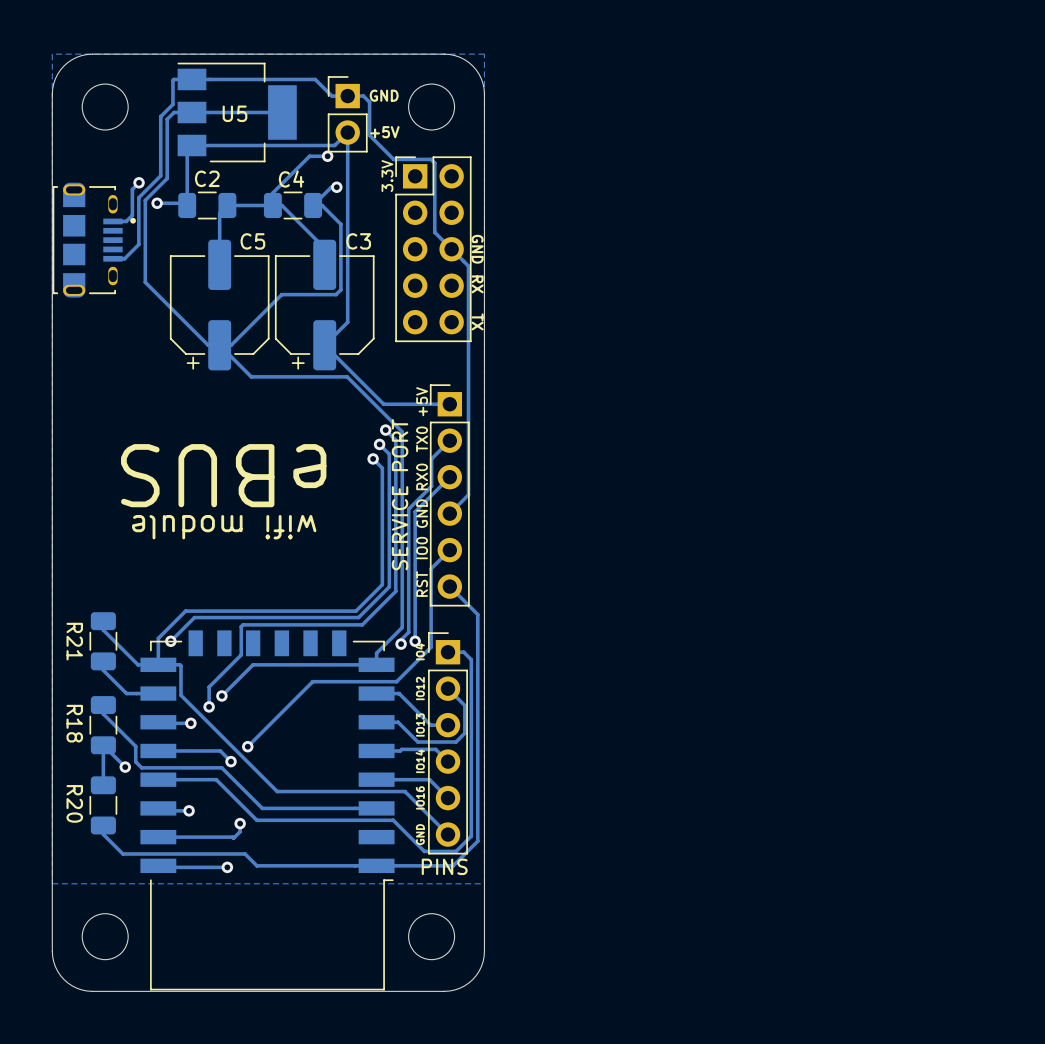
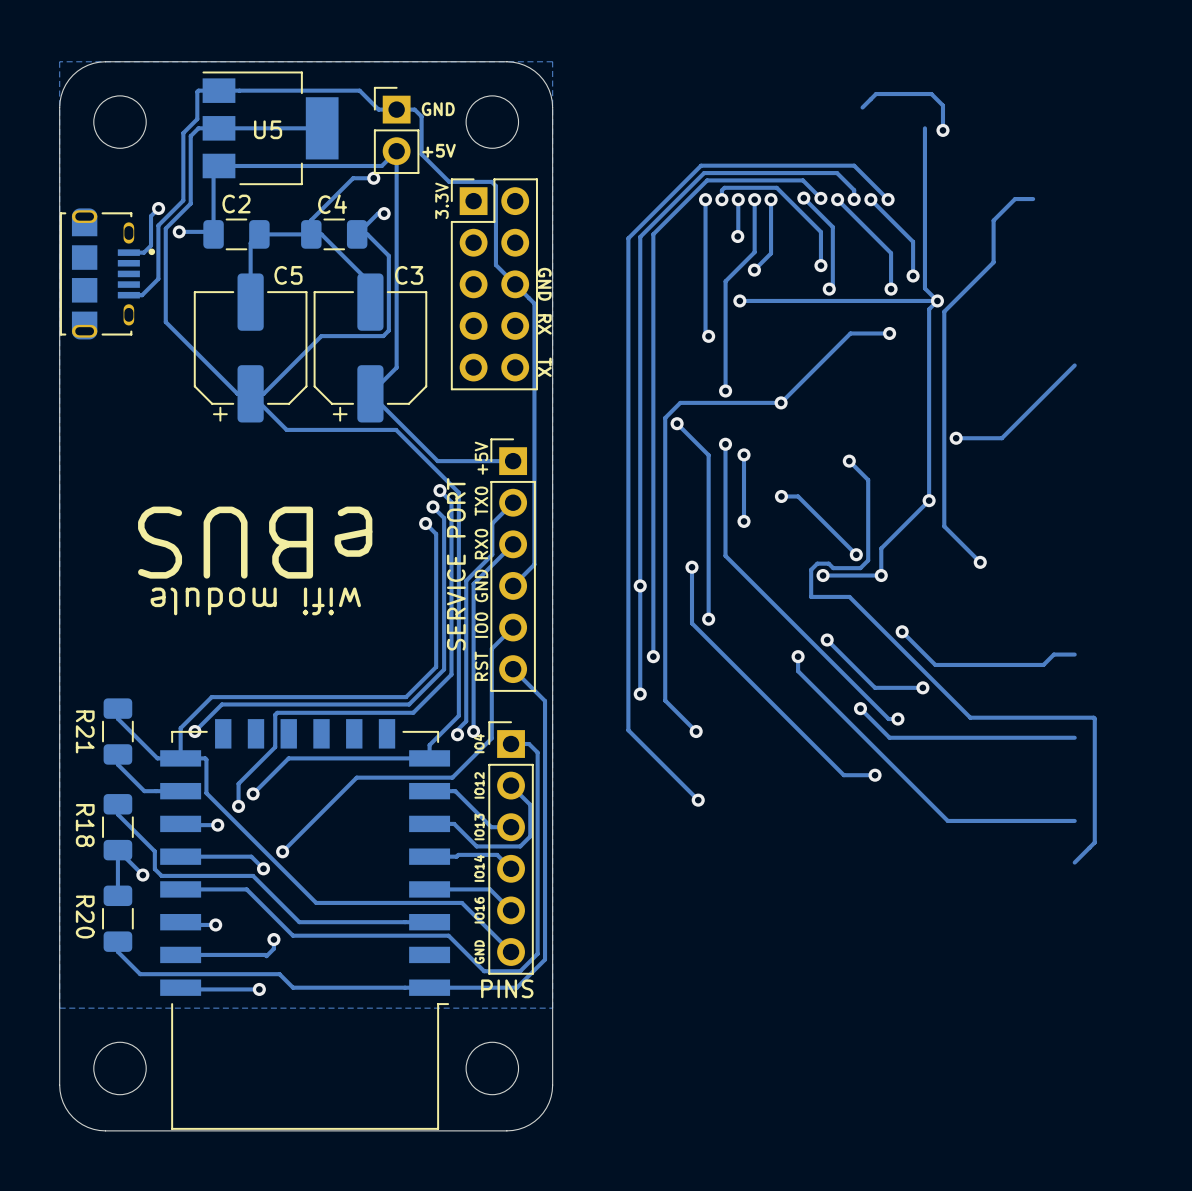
track: none -> (862, 107) (876, 94) (931, 94) (942, 105) (942, 130)
track: none -> (924, 128) (924, 288) (937, 300)
via: none -> (942, 130)
track: none -> (803, 198) (832, 227) (832, 285) (829, 289)
via: none -> (803, 198)
track: none -> (820, 198) (802, 180) (707, 180) (653, 234) (653, 656)
via: none -> (820, 198)
track: none -> (854, 199) (854, 190) (837, 173) (704, 173) (640, 236) (640, 694)
via: none -> (854, 199)
track: none -> (888, 199) (854, 165) (701, 165) (628, 238) (628, 730) (698, 800)
via: none -> (888, 199)
track: none -> (1033, 199) (1015, 199) (993, 220) (993, 262) (944, 311) (944, 526) (980, 562)
track: none -> (705, 199) (705, 333) (708, 336)
via: none -> (705, 199)
track: none -> (721, 199) (721, 190) (724, 187) (776, 187) (820, 232) (820, 265)
via: none -> (721, 199)
track: none -> (738, 199) (737, 236)
via: none -> (738, 199)
track: none -> (754, 199) (754, 252) (725, 281) (725, 391)
via: none -> (754, 199)
track: none -> (771, 199) (771, 253) (754, 270)
via: none -> (771, 199)
track: none -> (837, 199) (891, 253) (891, 289)
via: none -> (837, 199)
track: none -> (870, 199) (913, 241) (913, 276)
via: none -> (870, 199)
via: none -> (737, 236)
via: none -> (820, 265)
via: none -> (754, 270)
via: none -> (913, 276)
via: none -> (829, 289)
via: none -> (891, 289)
via: none -> (739, 300)
track: none -> (937, 300) (739, 300)
track: none -> (937, 300) (929, 309) (929, 500) (881, 548) (881, 575) (823, 575)
via: none -> (937, 300)
track: none -> (889, 333) (850, 333) (781, 402) (680, 402) (665, 417) (665, 700) (696, 731)
via: none -> (889, 333)
via: none -> (708, 336)
track: none -> (1074, 365) (1001, 438) (956, 438)
via: none -> (725, 391)
via: none -> (781, 402)
track: none -> (677, 423) (708, 455) (708, 619)
via: none -> (677, 423)
via: none -> (956, 438)
track: none -> (725, 444) (725, 555) (888, 719) (897, 719)
via: none -> (725, 444)
track: none -> (744, 454) (744, 521)
via: none -> (744, 454)
track: none -> (849, 461) (868, 480) (868, 560) (860, 568) (833, 568) (828, 563) (817, 563) (811, 569) (811, 596) (849, 596) (970, 717) (1094, 718) (1094, 842) (1074, 862)
via: none -> (849, 461)
track: none -> (781, 496) (798, 496) (856, 554)
via: none -> (781, 496)
via: none -> (929, 500)
via: none -> (744, 521)
via: none -> (856, 554)
via: none -> (980, 562)
track: none -> (692, 567) (692, 623) (843, 775) (875, 775)
via: none -> (692, 567)
via: none -> (823, 575)
via: none -> (881, 575)
via: none -> (640, 585)
via: none -> (708, 619)
track: none -> (902, 631) (935, 664) (1043, 664) (1053, 654) (1074, 654)
via: none -> (902, 631)
track: none -> (827, 640) (875, 687) (922, 687)
via: none -> (827, 640)
via: none -> (653, 656)
track: none -> (798, 656) (798, 671) (947, 820) (1074, 820)
via: none -> (798, 656)
via: none -> (922, 687)
via: none -> (640, 694)
track: none -> (860, 708) (889, 737) (1074, 737)
via: none -> (860, 708)
via: none -> (897, 719)
via: none -> (696, 731)
via: none -> (875, 775)
via: none -> (698, 800)

